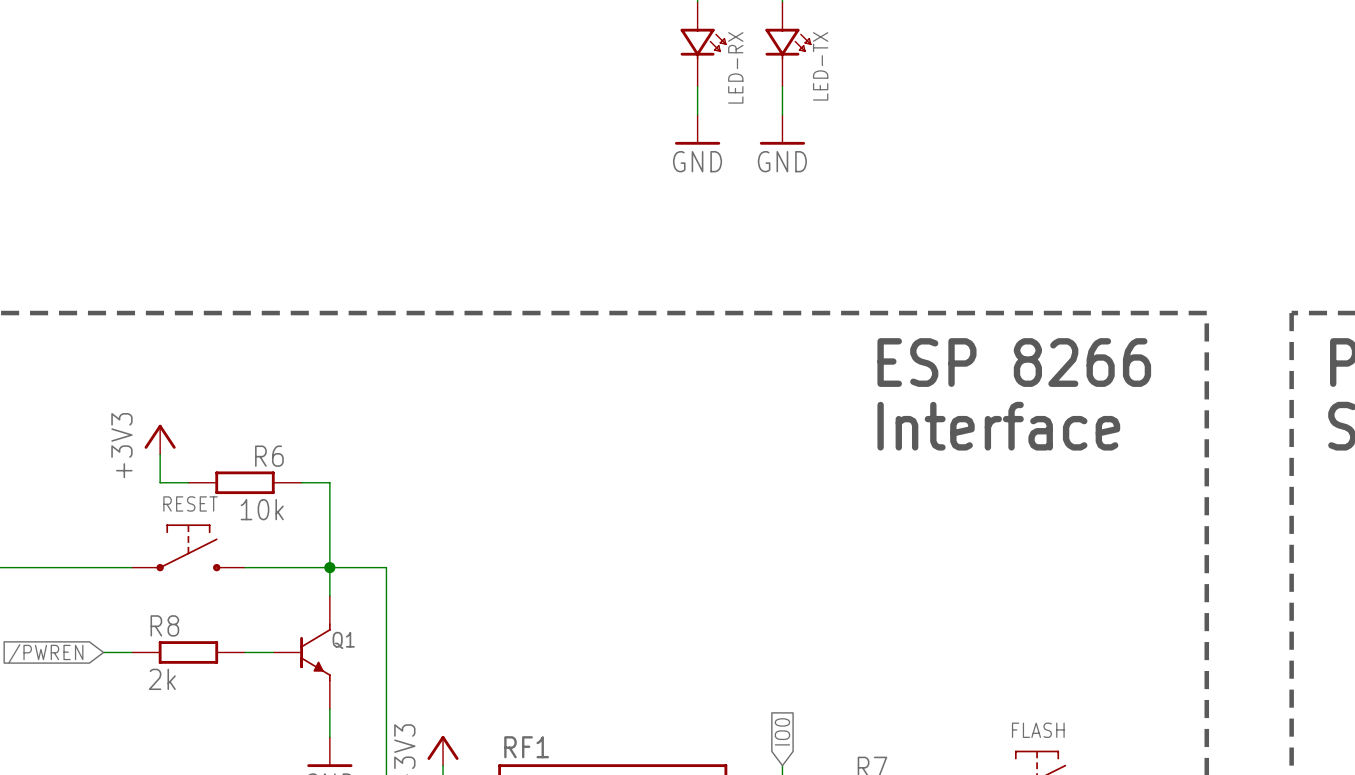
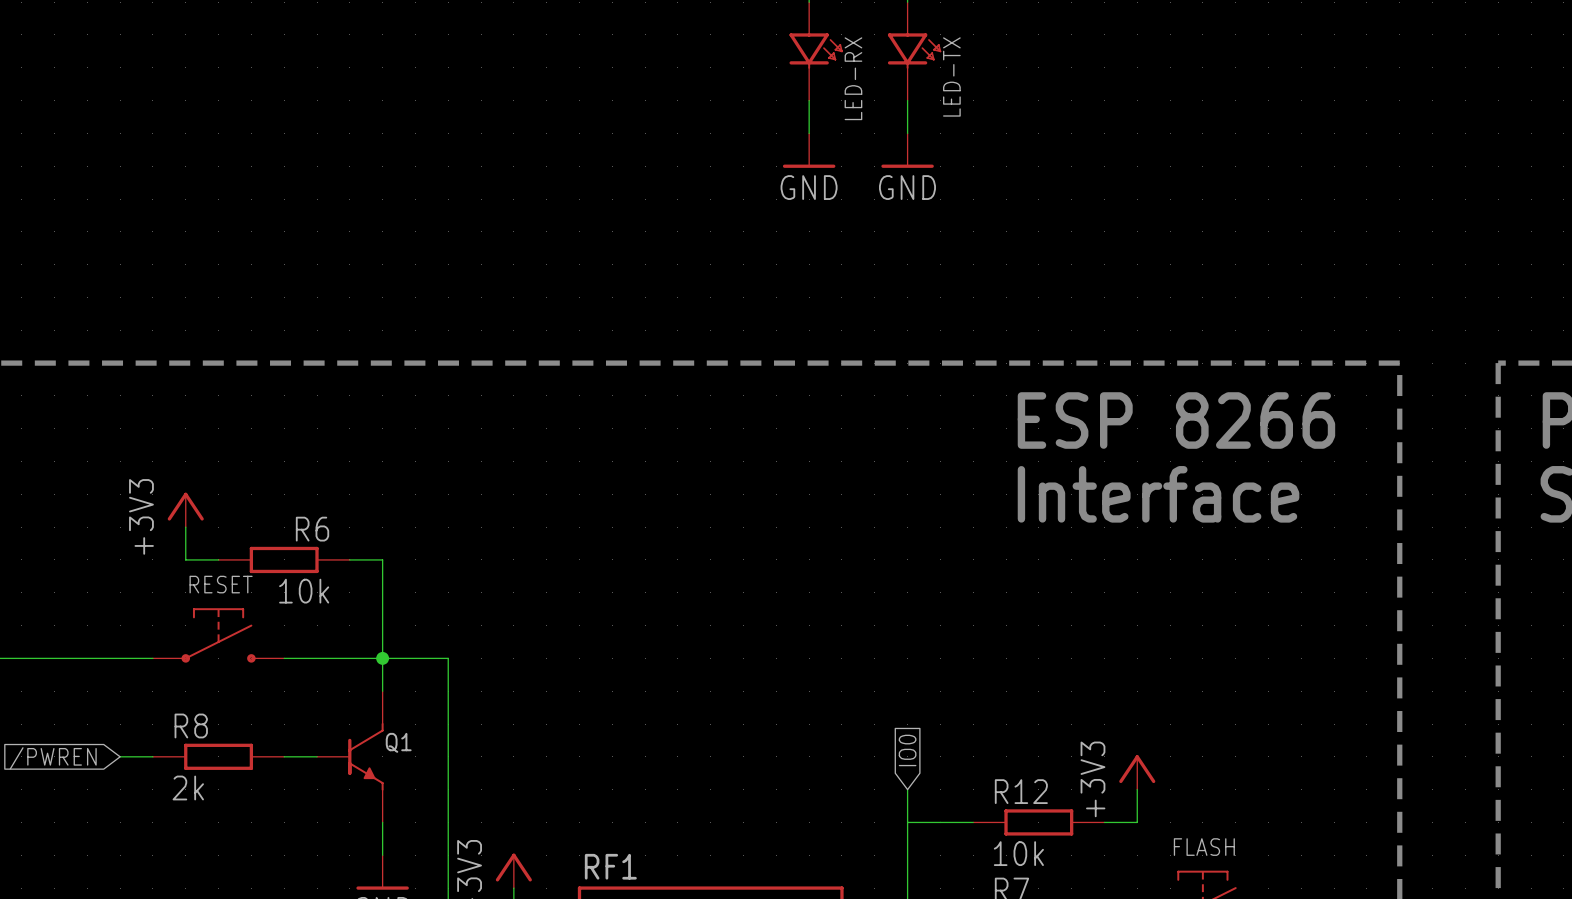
power symbol: none -> +3V3 (1137, 772)
wire: none -> (907, 789) (907, 888)
wire: none -> (1137, 789) (1137, 822) (1104, 822)
wire: none -> (907, 822) (973, 822)
R12: none -> 10k (1038, 822)
global label position: IO0 (782, 731) -> IO0 (907, 750)

